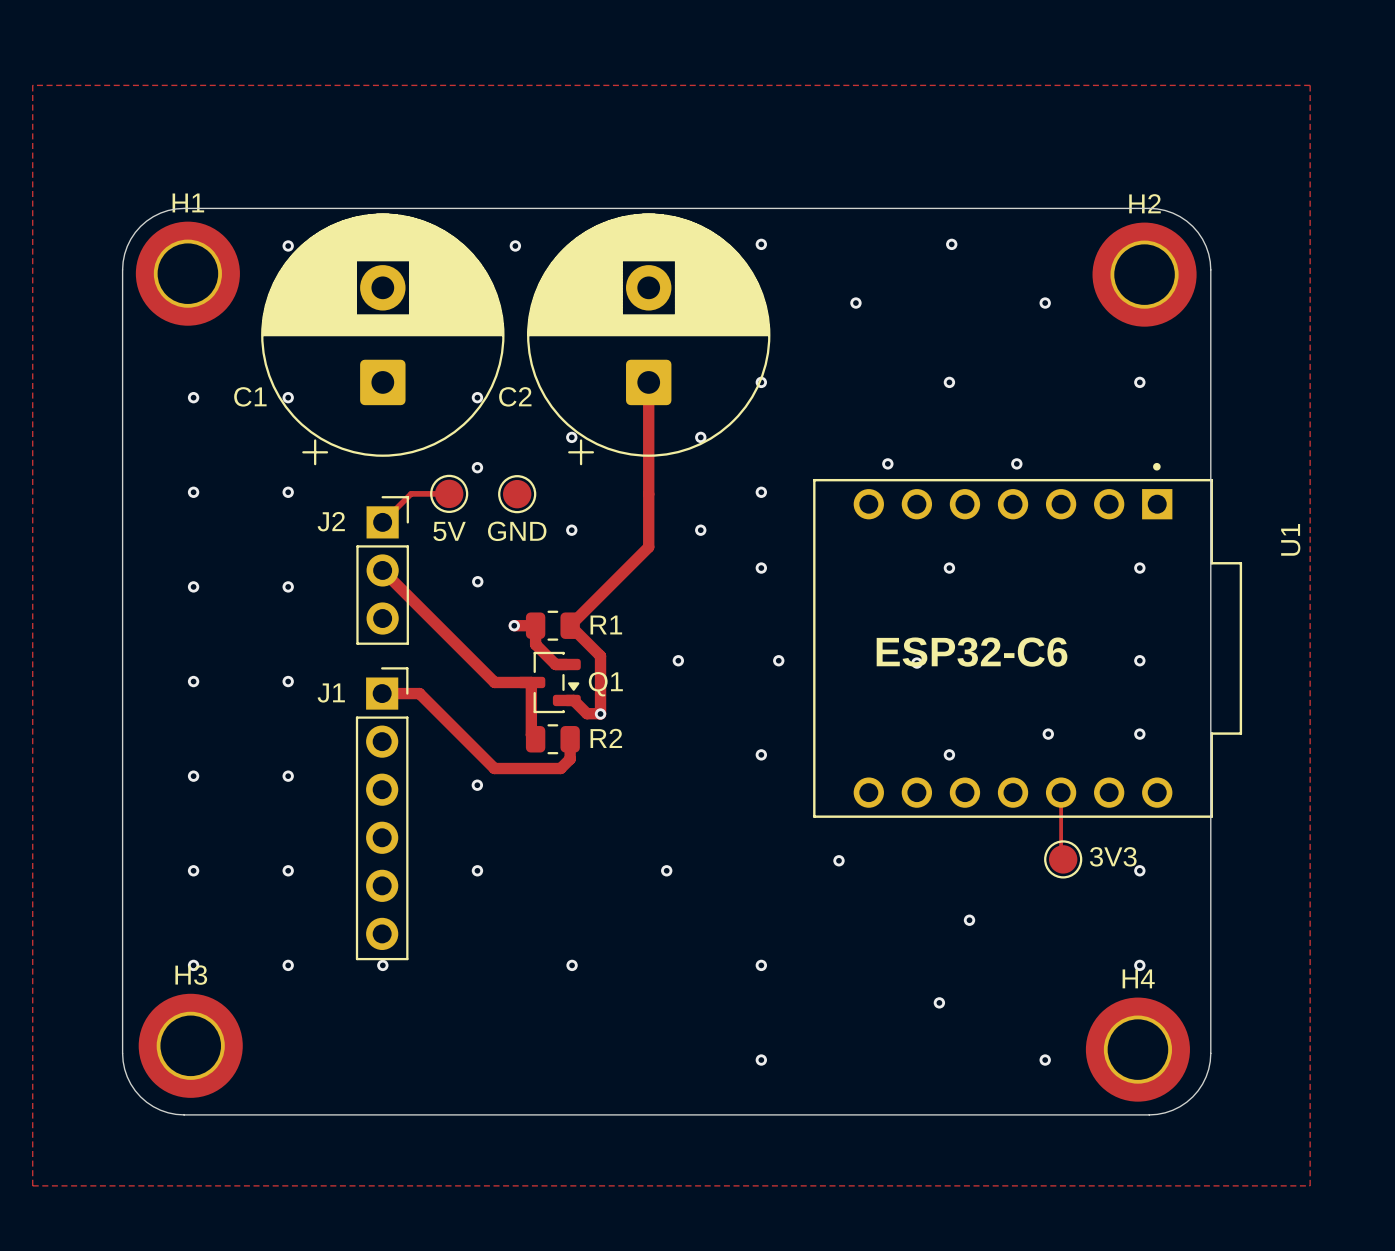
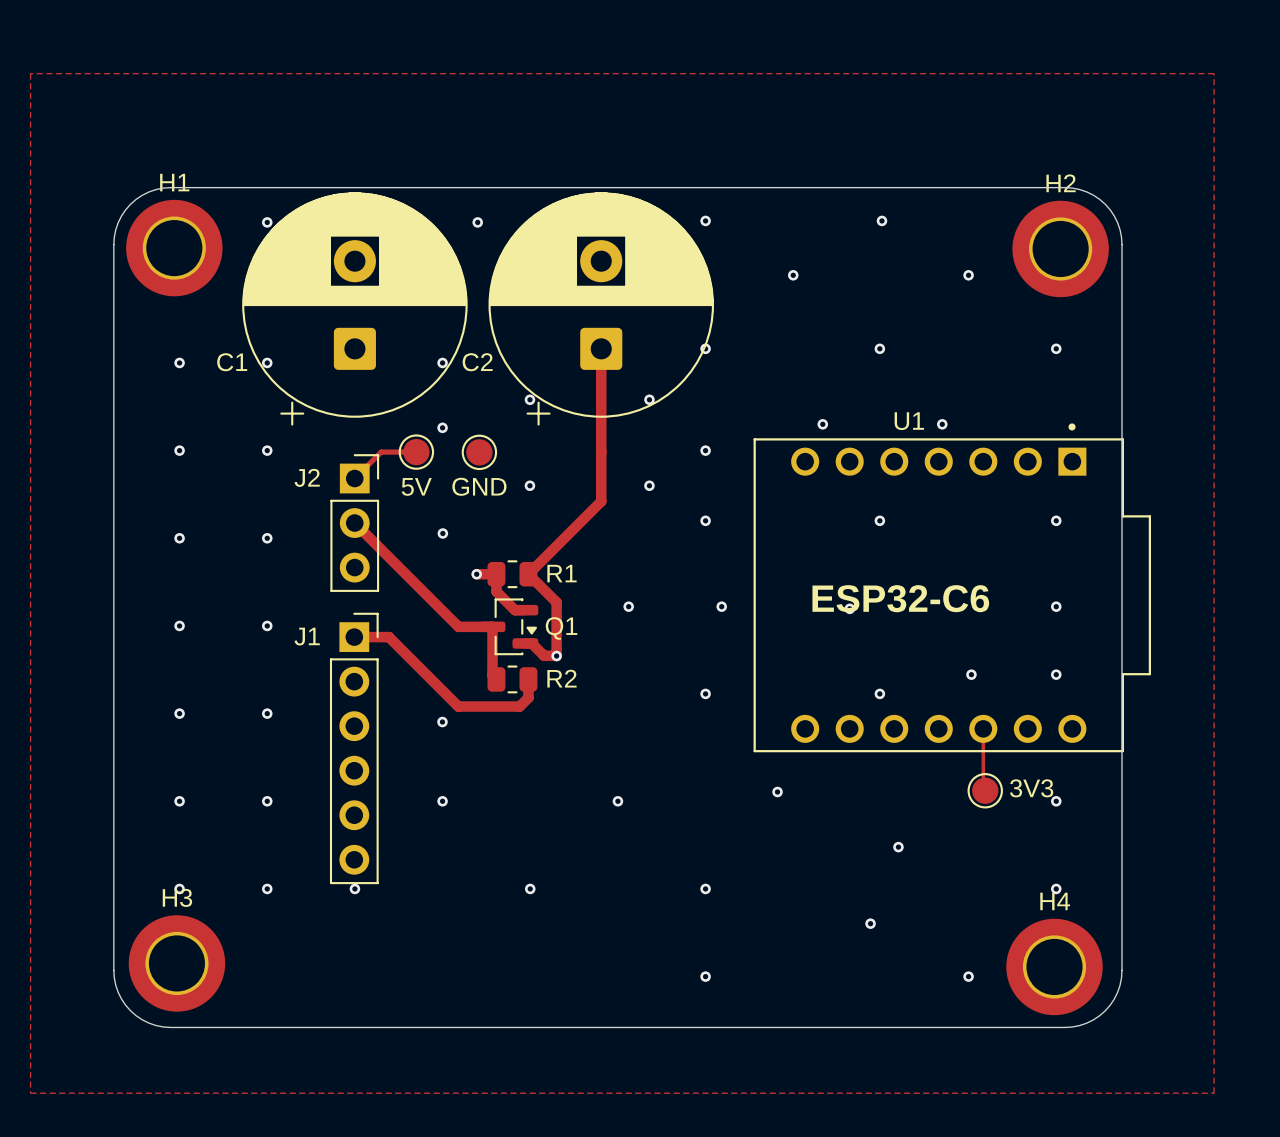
U1 name rotation: 0° (1290, 539) -> 90° clockwise (909, 421)
U1 name position: U1 (1290, 539) -> U1 (909, 421)

